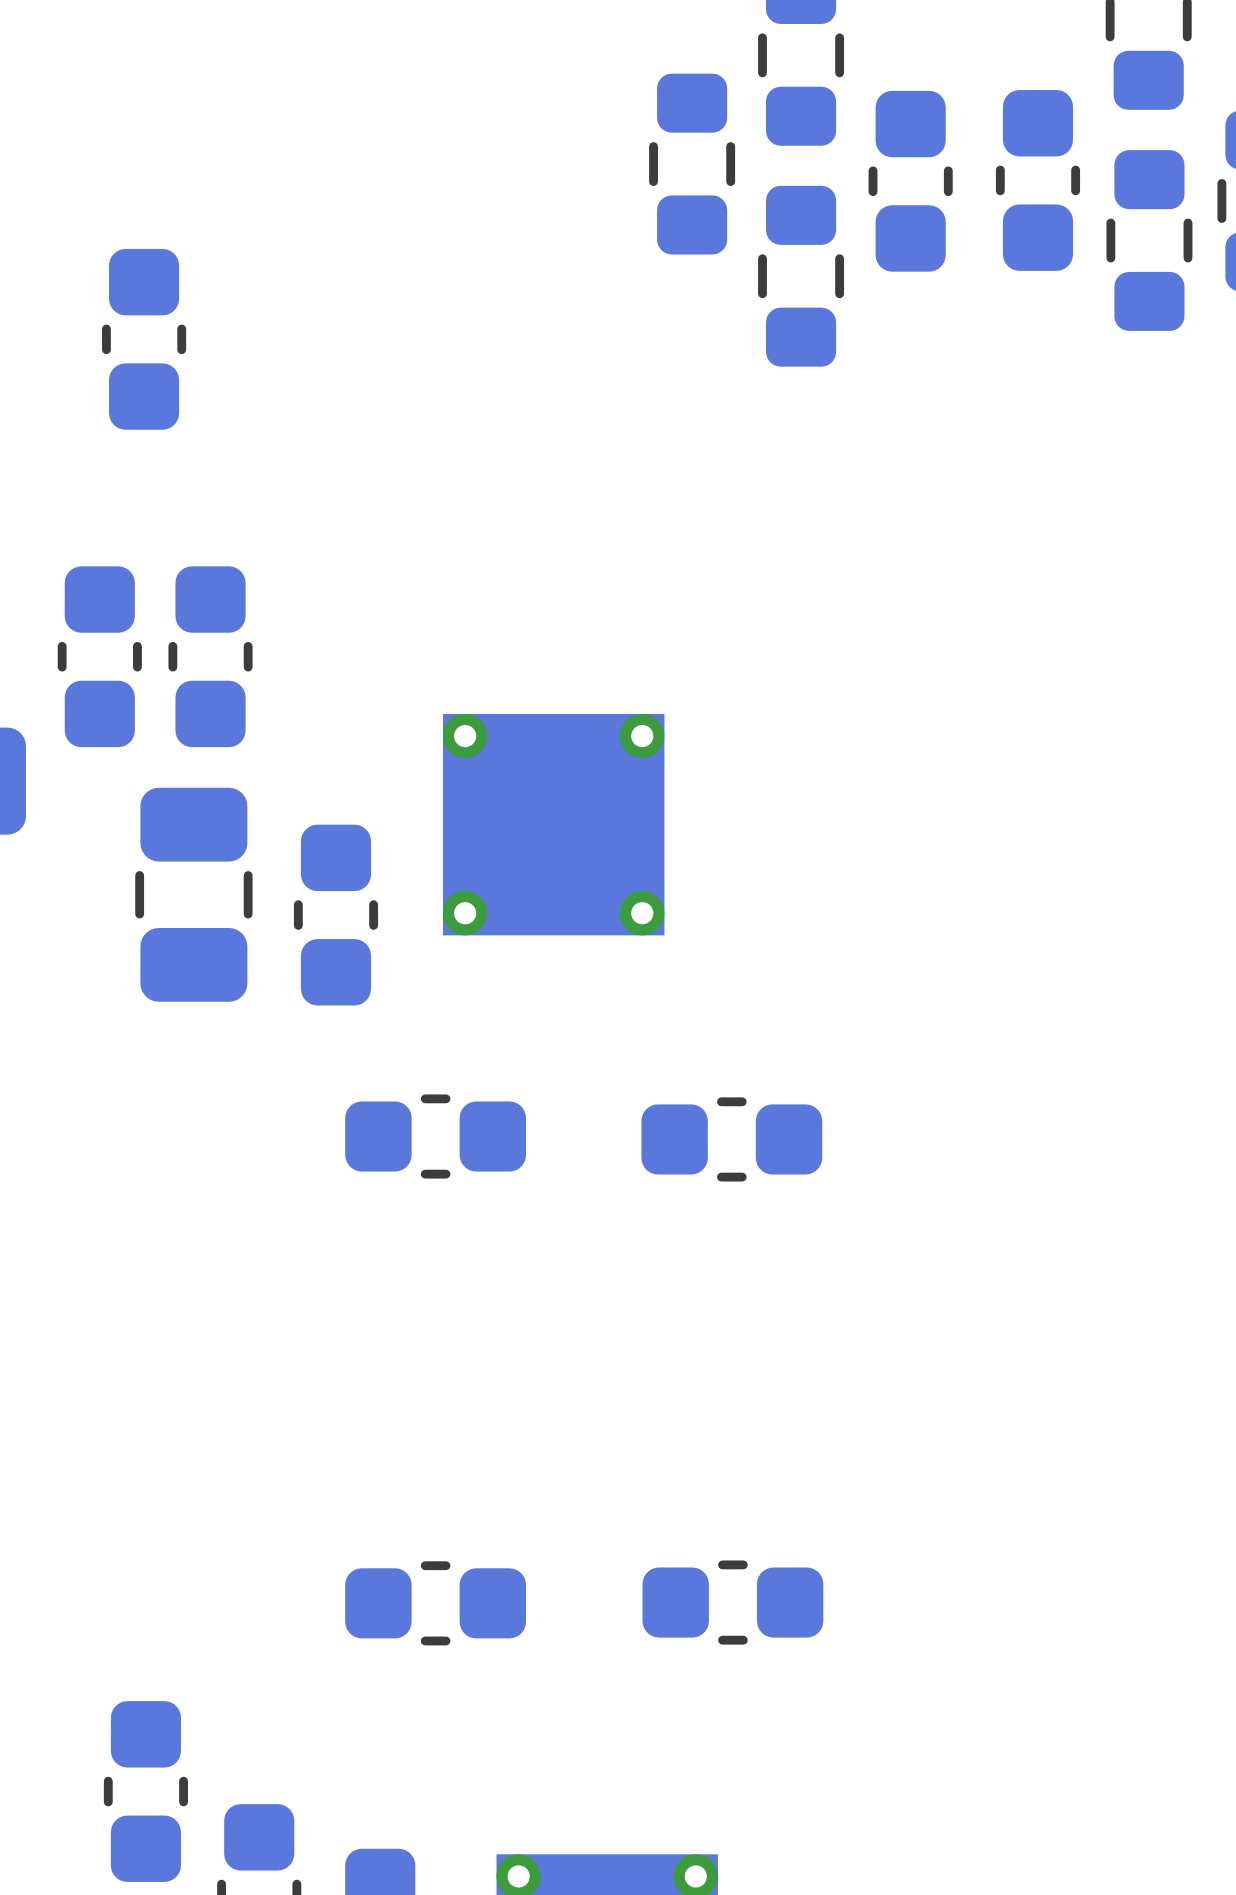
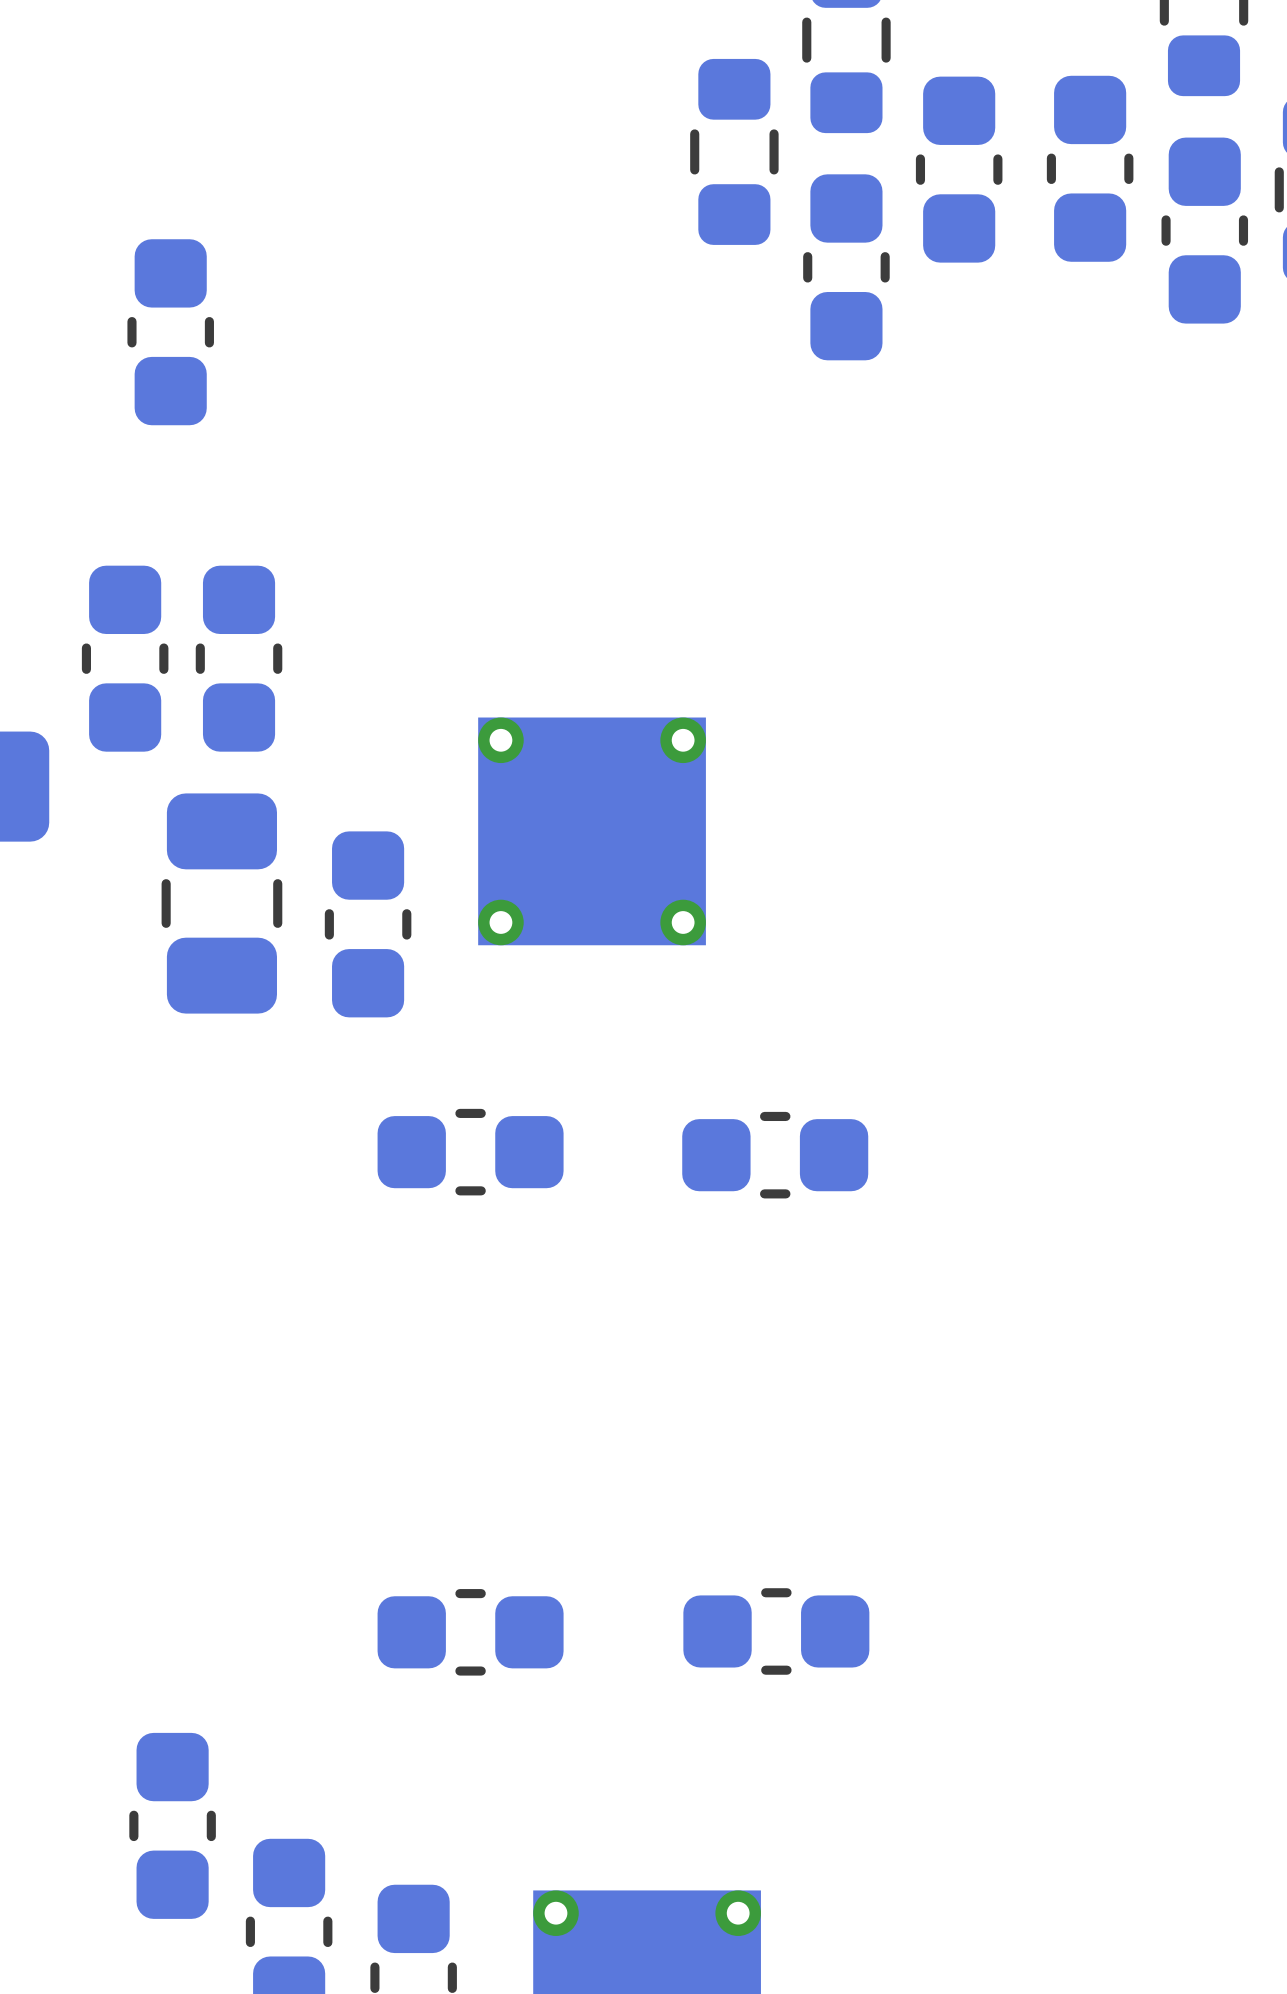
part footprint: [1106, 150, 1193, 331] -> [1161, 137, 1249, 324]
part footprint: [758, 185, 845, 367] -> [803, 174, 890, 361]

